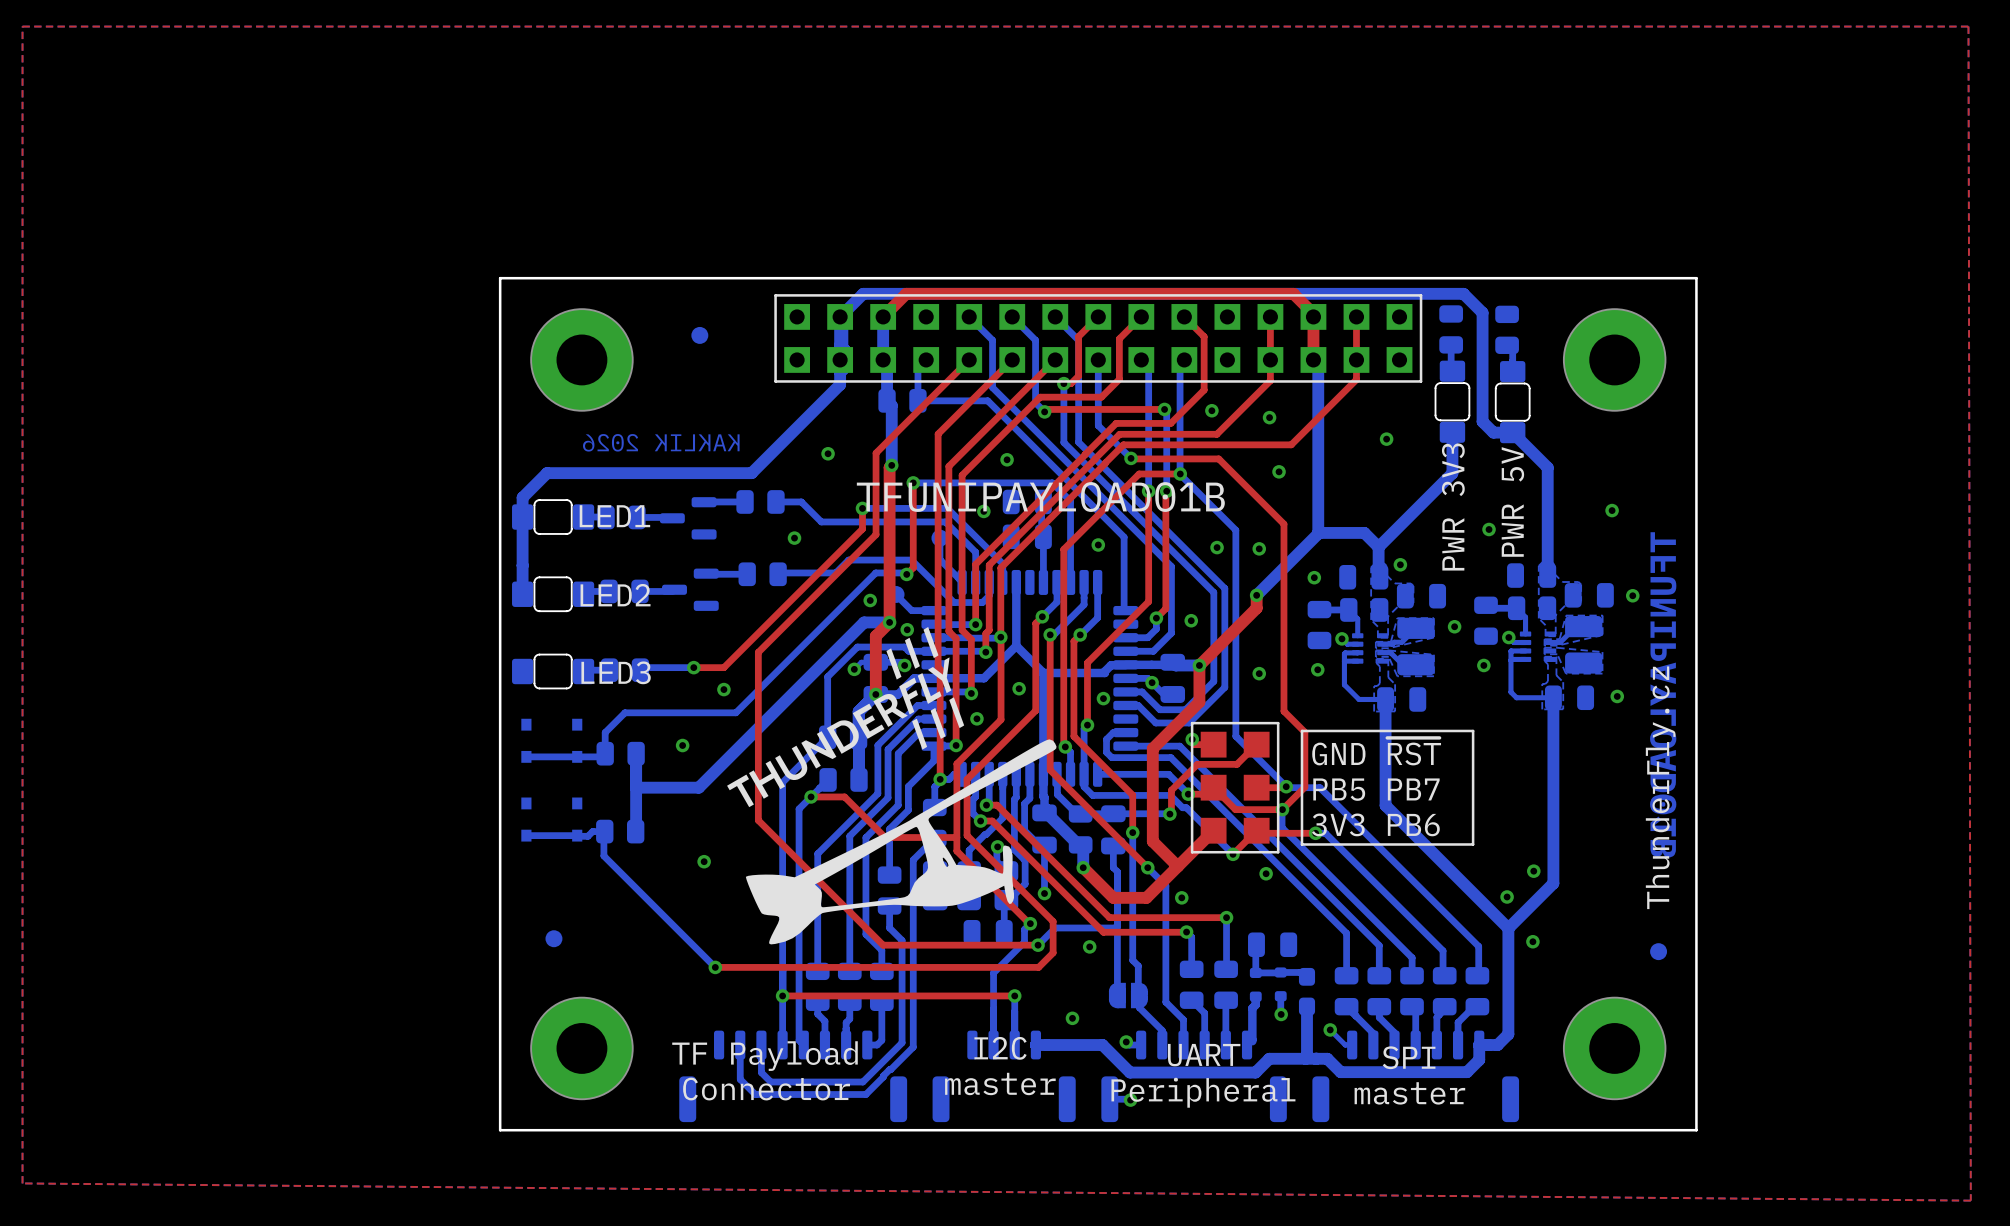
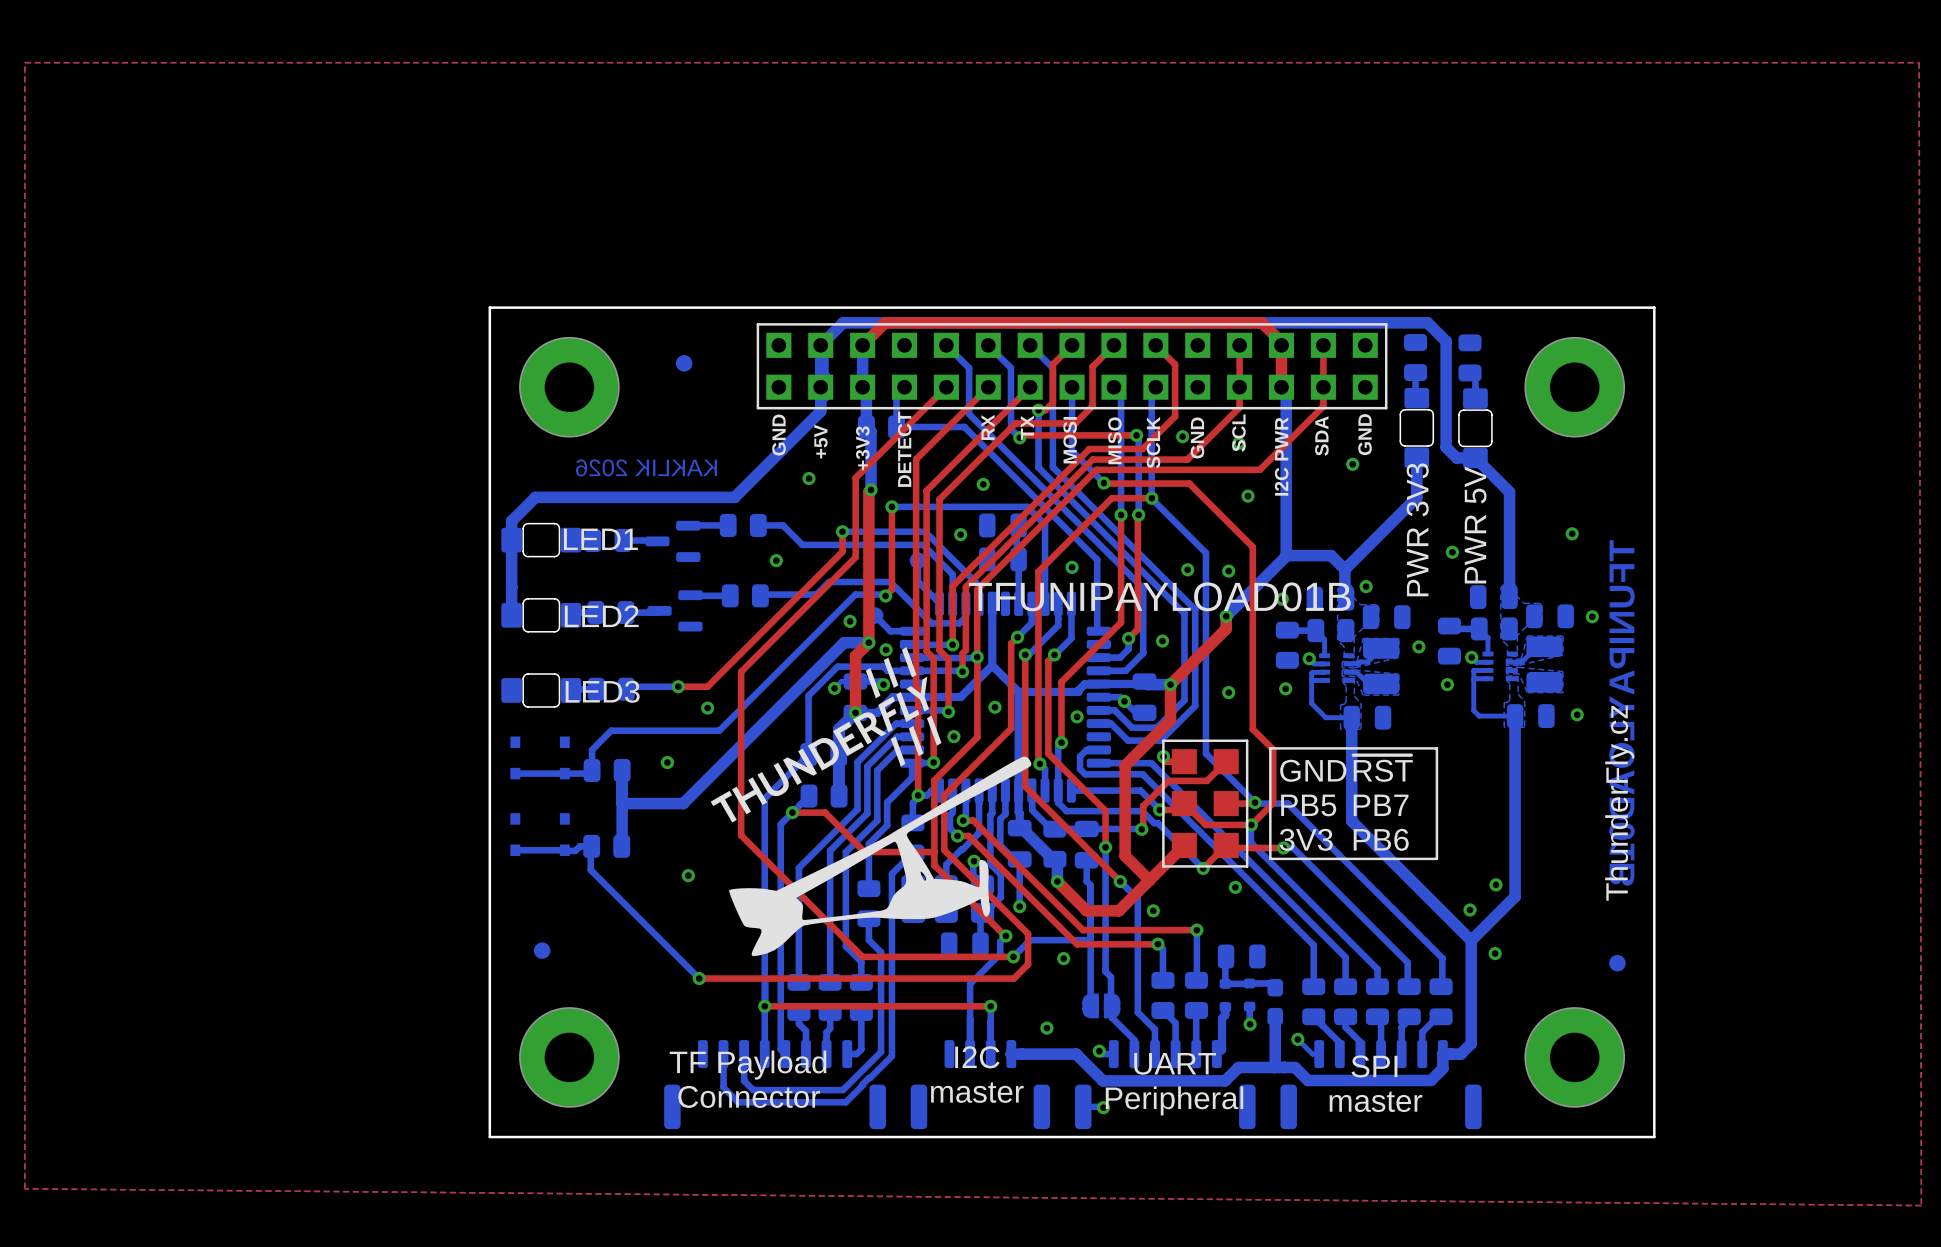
text: none -> TX (1027, 427)
text: none -> RX (988, 427)
text: none -> SCL (1238, 432)
text: none -> GND (779, 435)
text: none -> SDA (1321, 436)
text: none -> GND (1365, 434)
text: none -> +5V (820, 441)
text: none -> MOSI (1070, 440)
text: none -> GND (1197, 437)
text: none -> MISO (1114, 440)
text: none -> SCLK (1153, 442)
text: none -> +3V3 (862, 448)
text: none -> DETECT (904, 449)
text: none -> I2C PWR (1281, 456)
text position: TFUNIPAYLOAD01B (1040, 497) -> TFUNIPAYLOAD01B (1159, 596)

